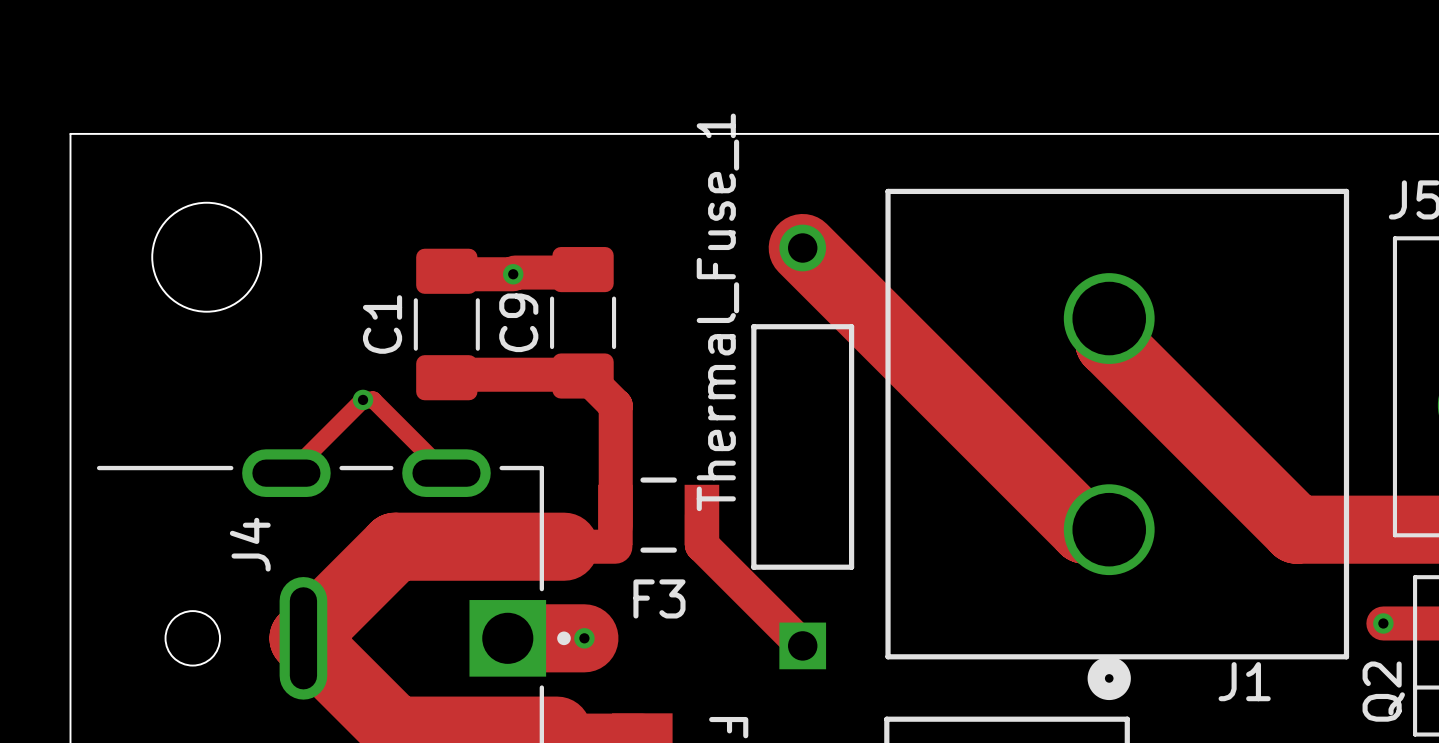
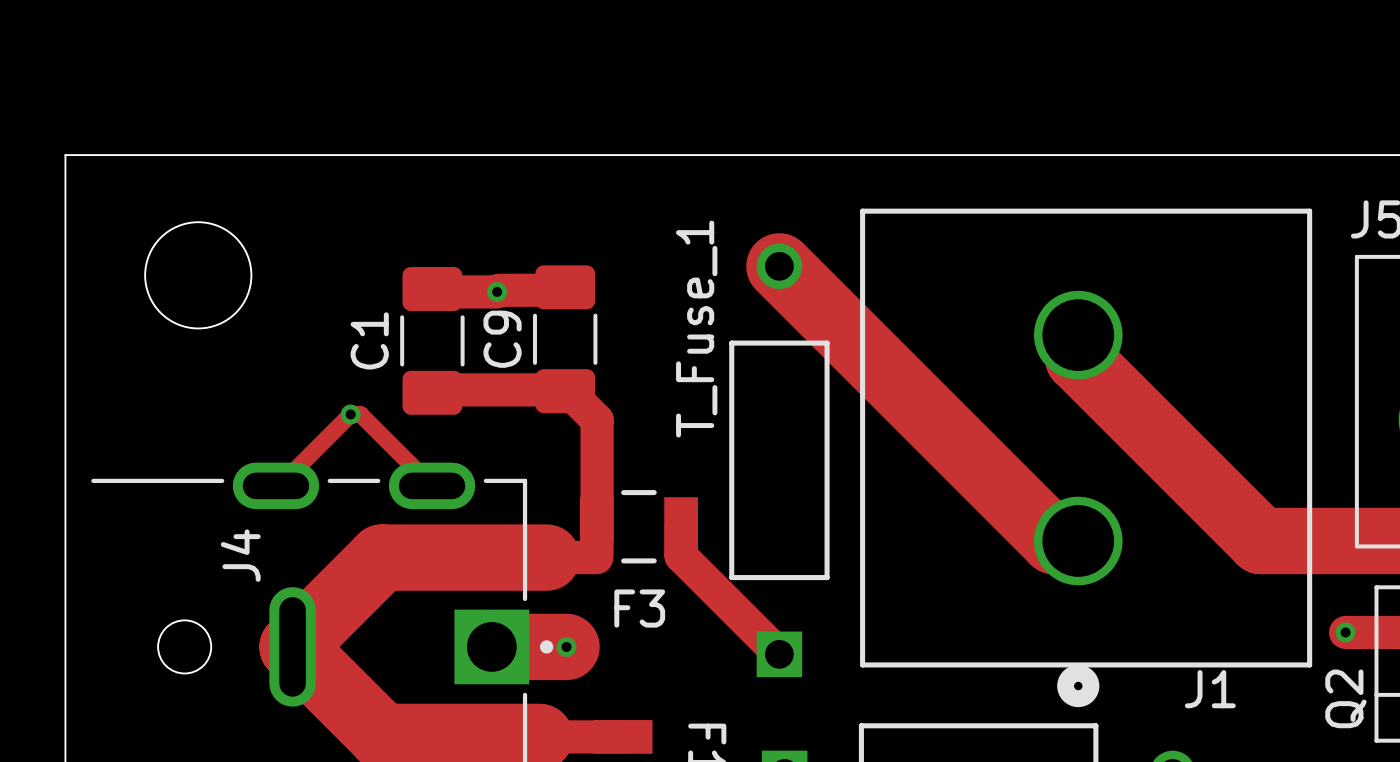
Thermal_Fuse_1 name: Thermal_Fuse_1 (717, 312) -> T_Fuse_1 (696, 329)

